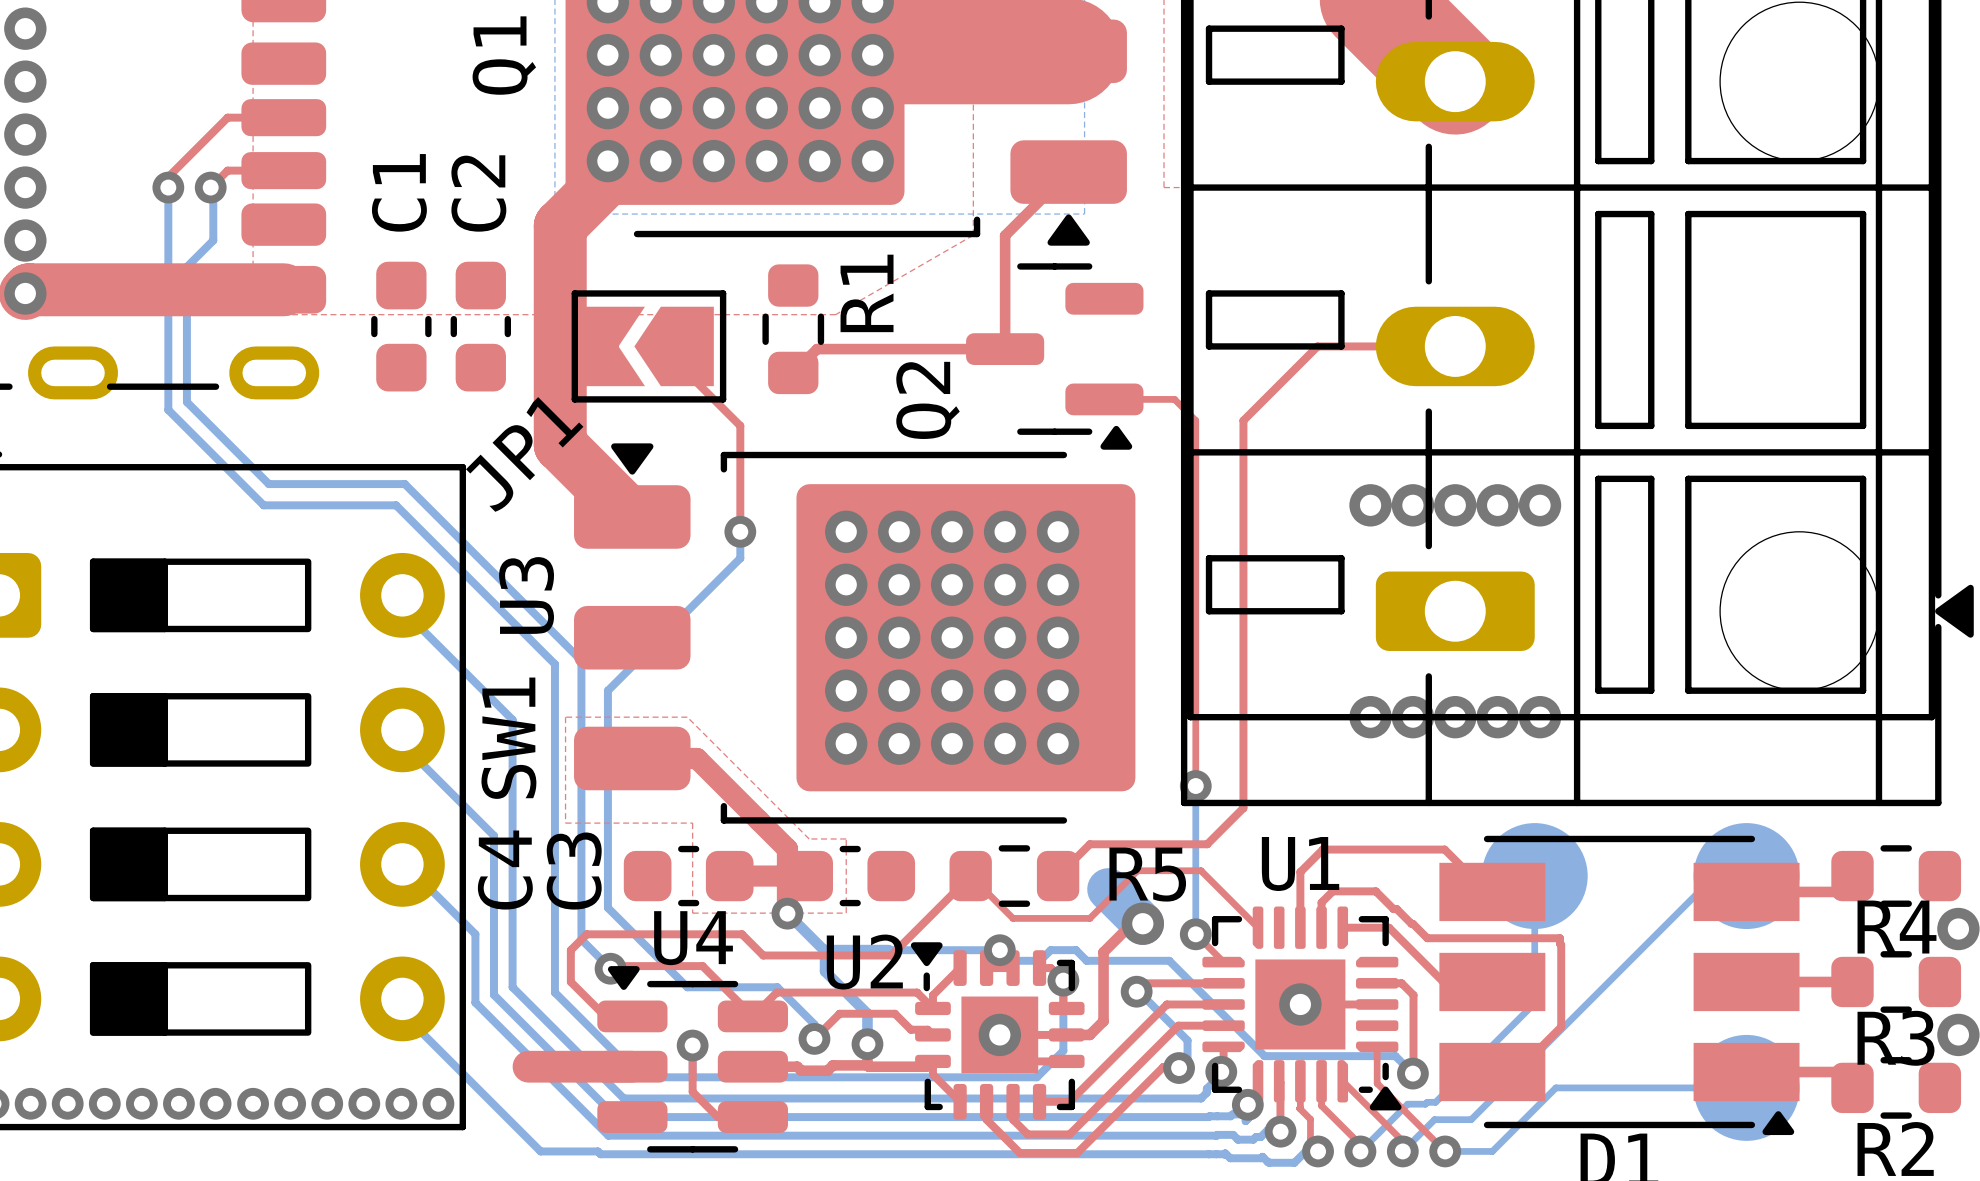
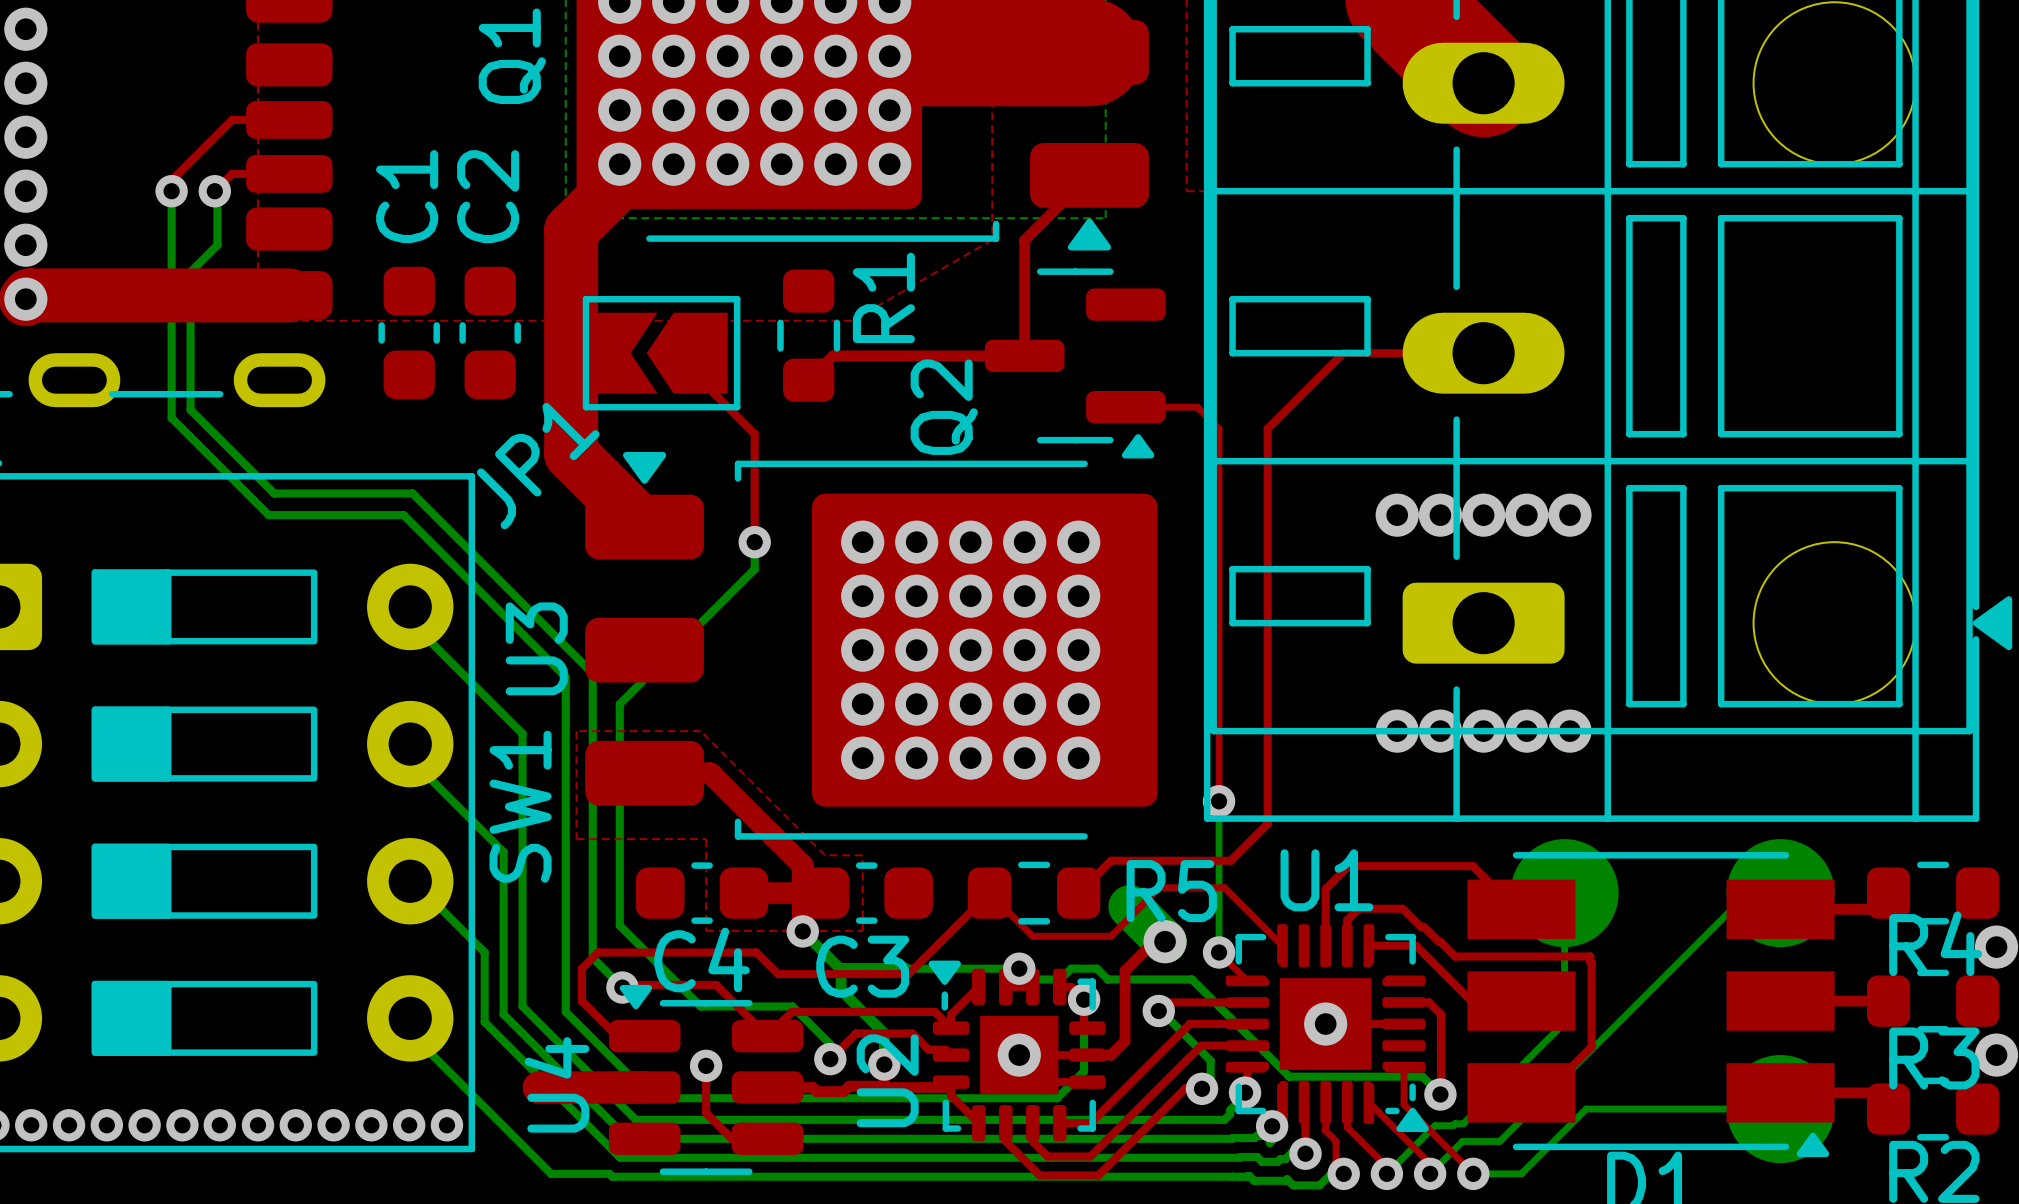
U3 name position: U3 (526, 595) -> U3 (536, 648)
SW1 name position: SW1 (508, 738) -> SW1 (520, 806)
C4 name rotation: 0° (505, 870) -> 90° clockwise (702, 959)
C4 name position: C4 (505, 870) -> C4 (702, 959)
C3 name rotation: 0° (574, 871) -> 90° clockwise (862, 966)
C3 name position: C3 (574, 871) -> C3 (862, 966)
U4 name rotation: 0° (693, 938) -> 90° counterclockwise (557, 1084)
U4 name position: U4 (693, 938) -> U4 (557, 1084)
U2 name rotation: 0° (864, 962) -> 90° counterclockwise (887, 1080)

